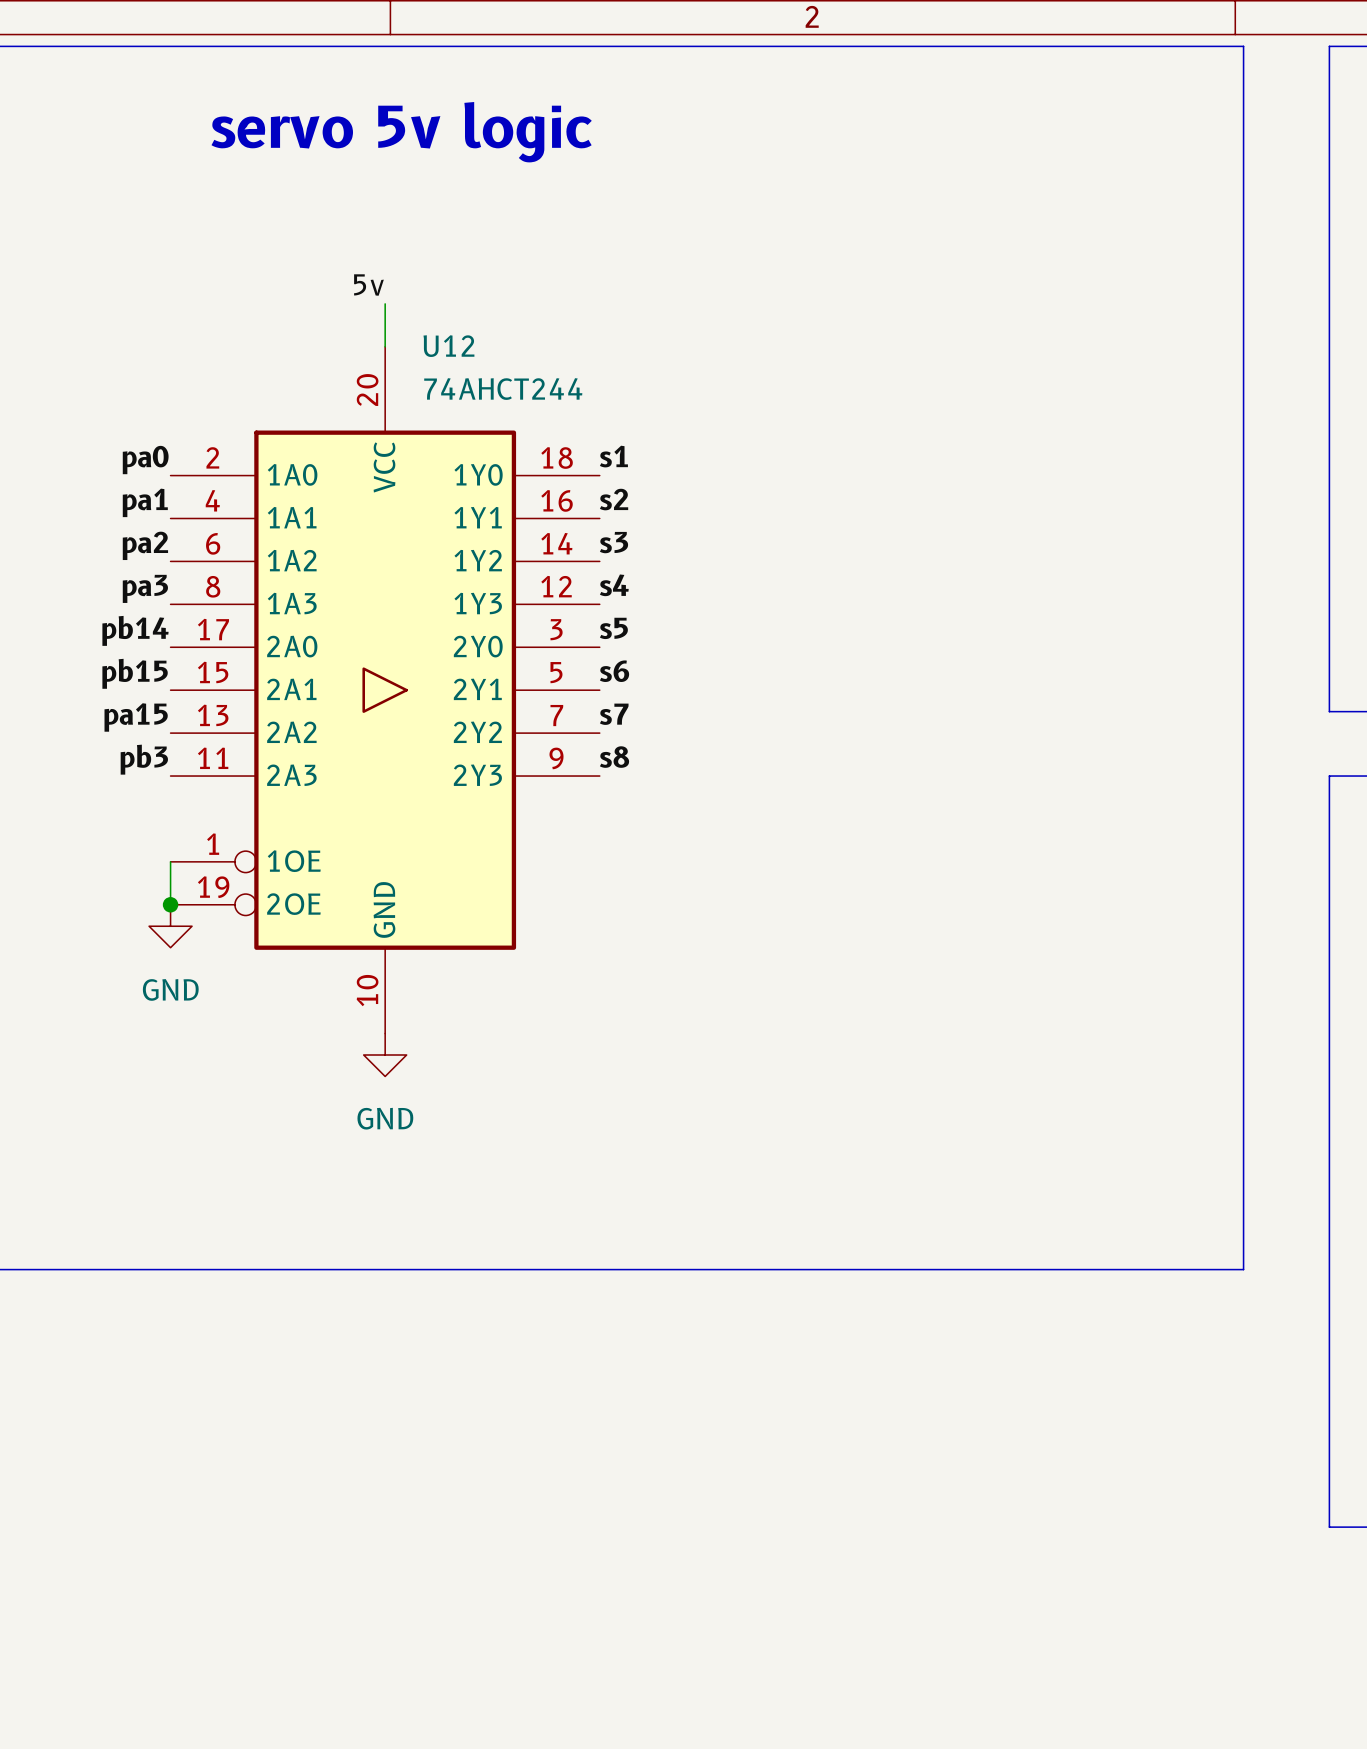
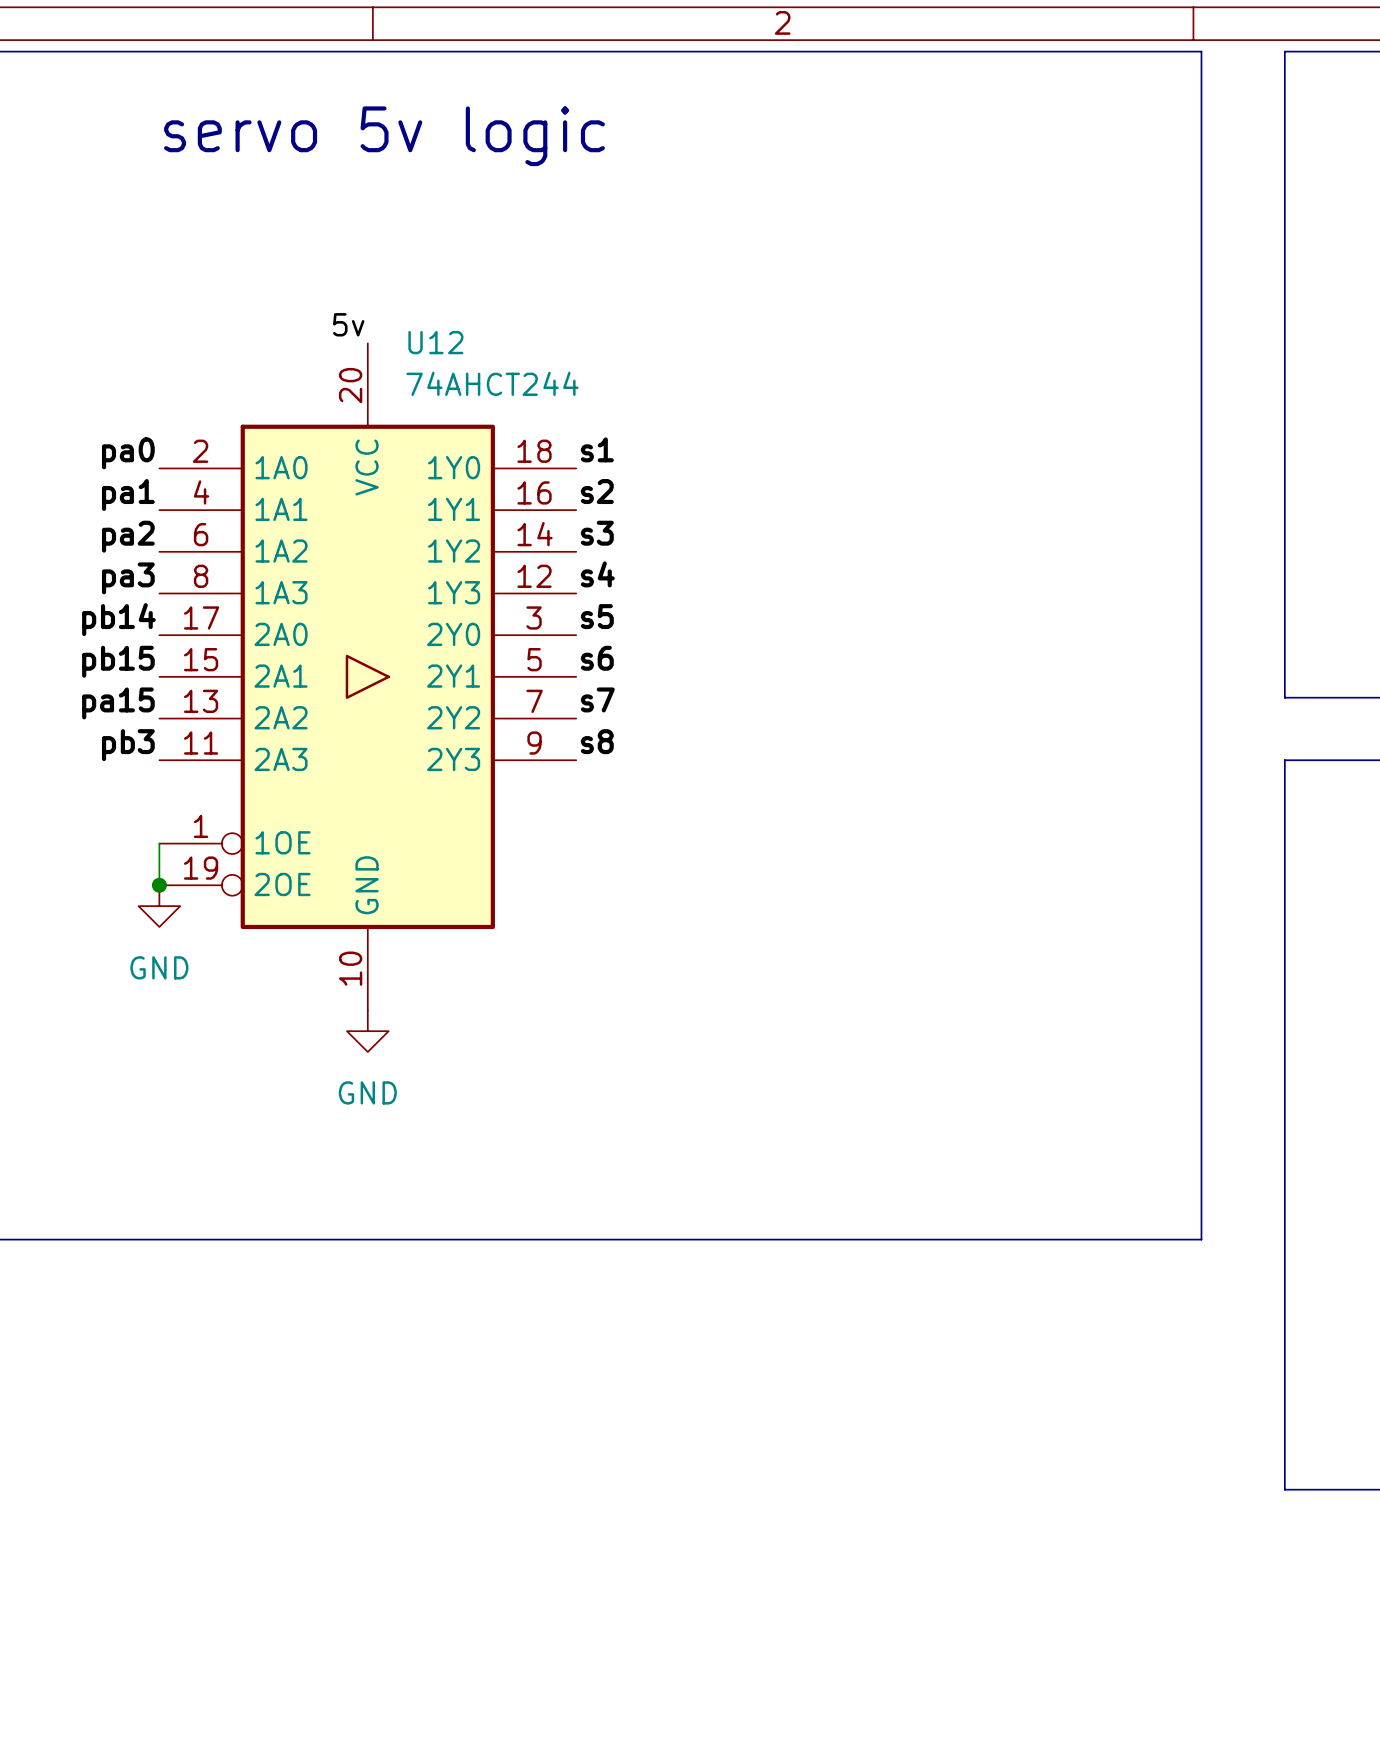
label position: 5v (368, 285) -> 5v (348, 324)
wire: (385, 303) (385, 346) -> none

